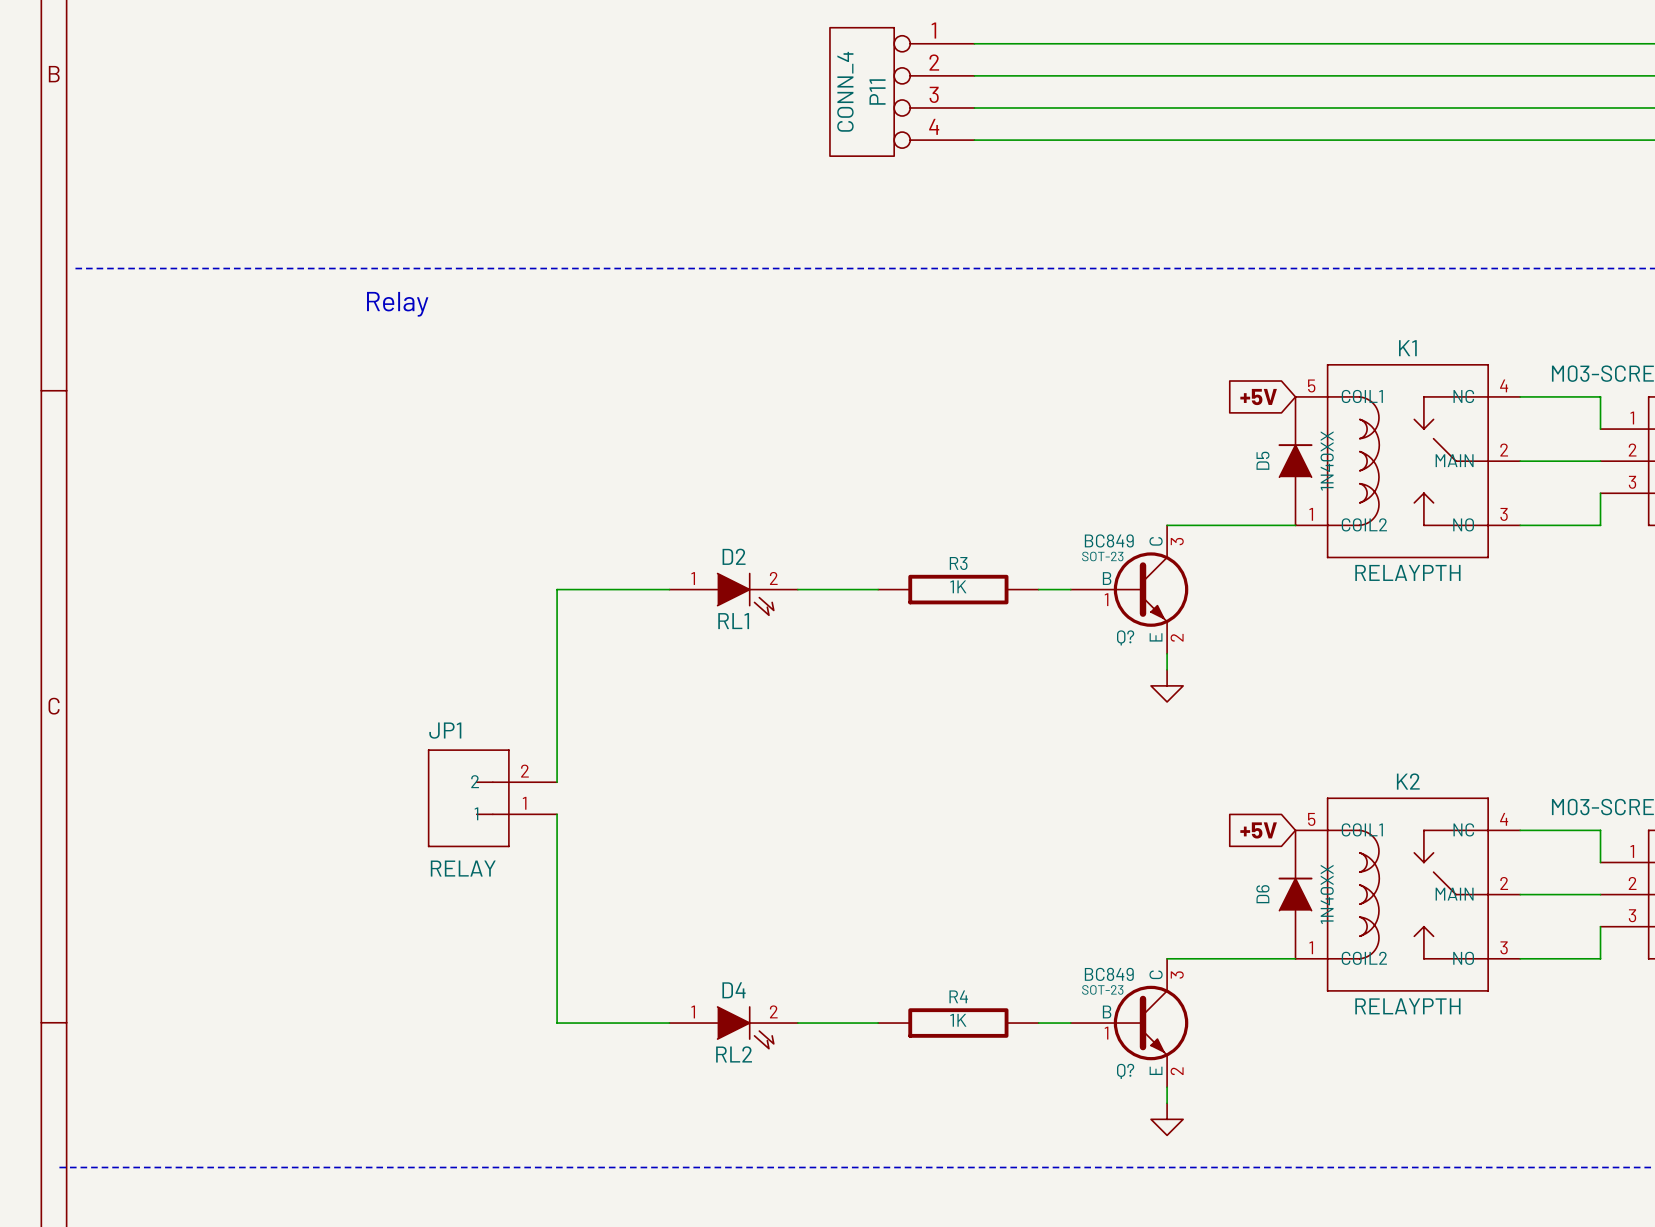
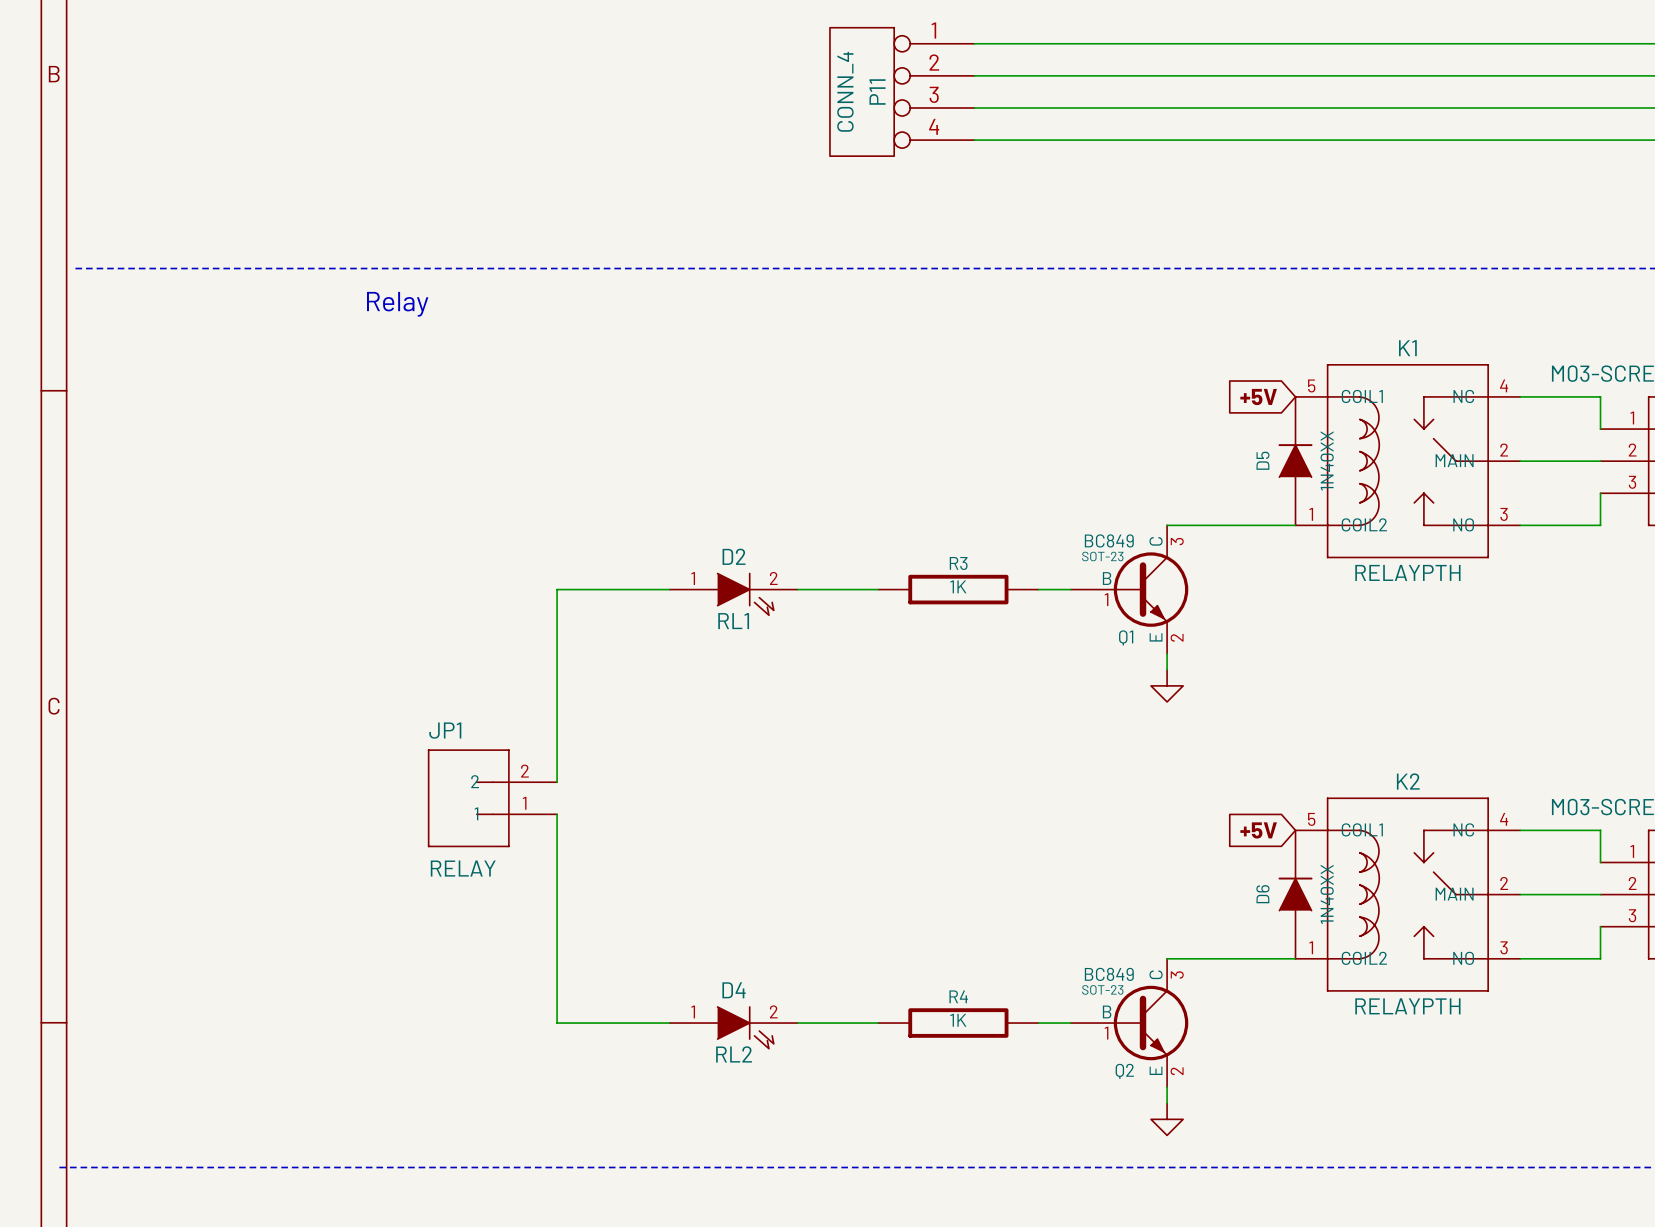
Q? name: Q? (1125, 637) -> Q1 (1126, 637)
Q? name: Q? (1125, 1071) -> Q2 (1124, 1071)

